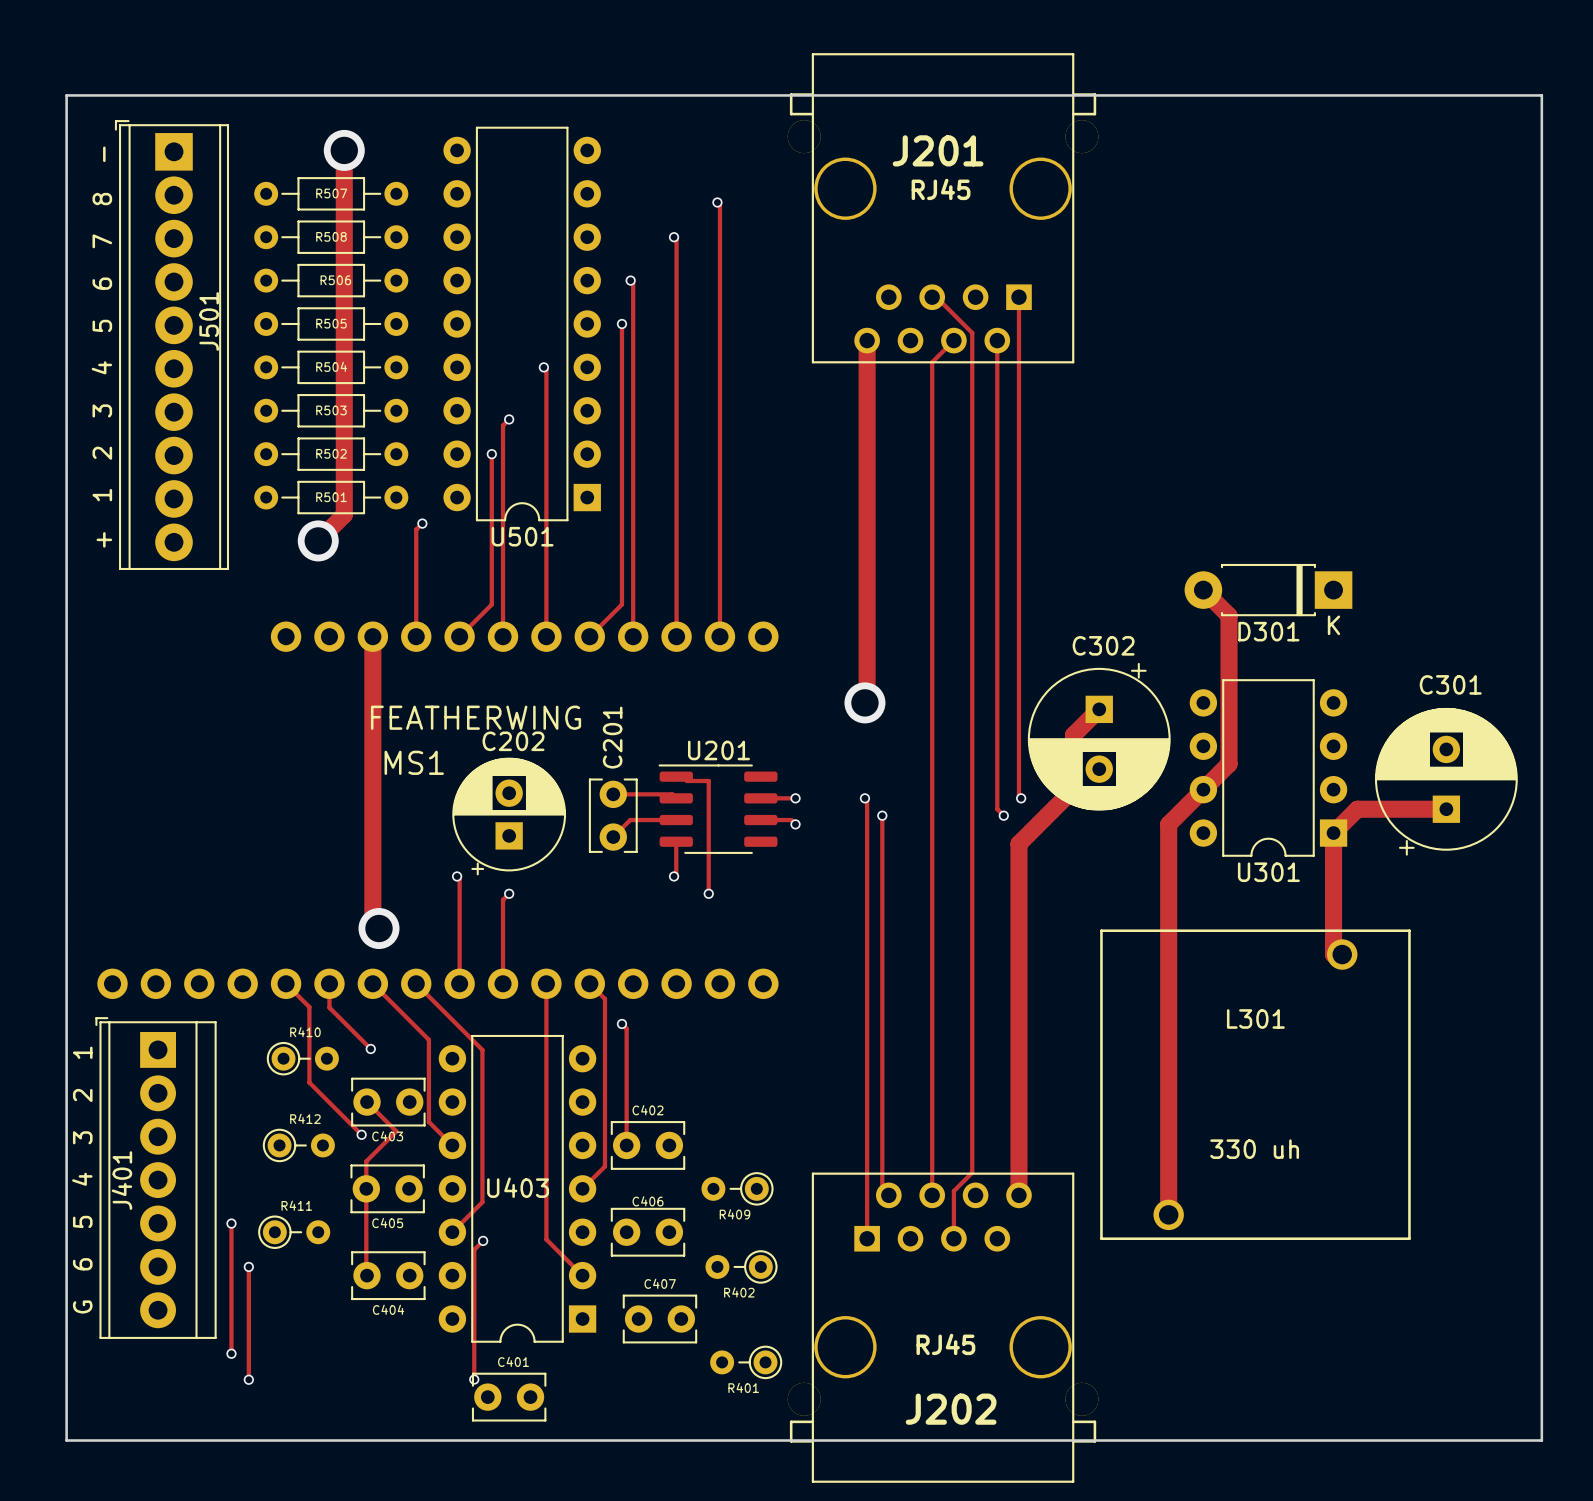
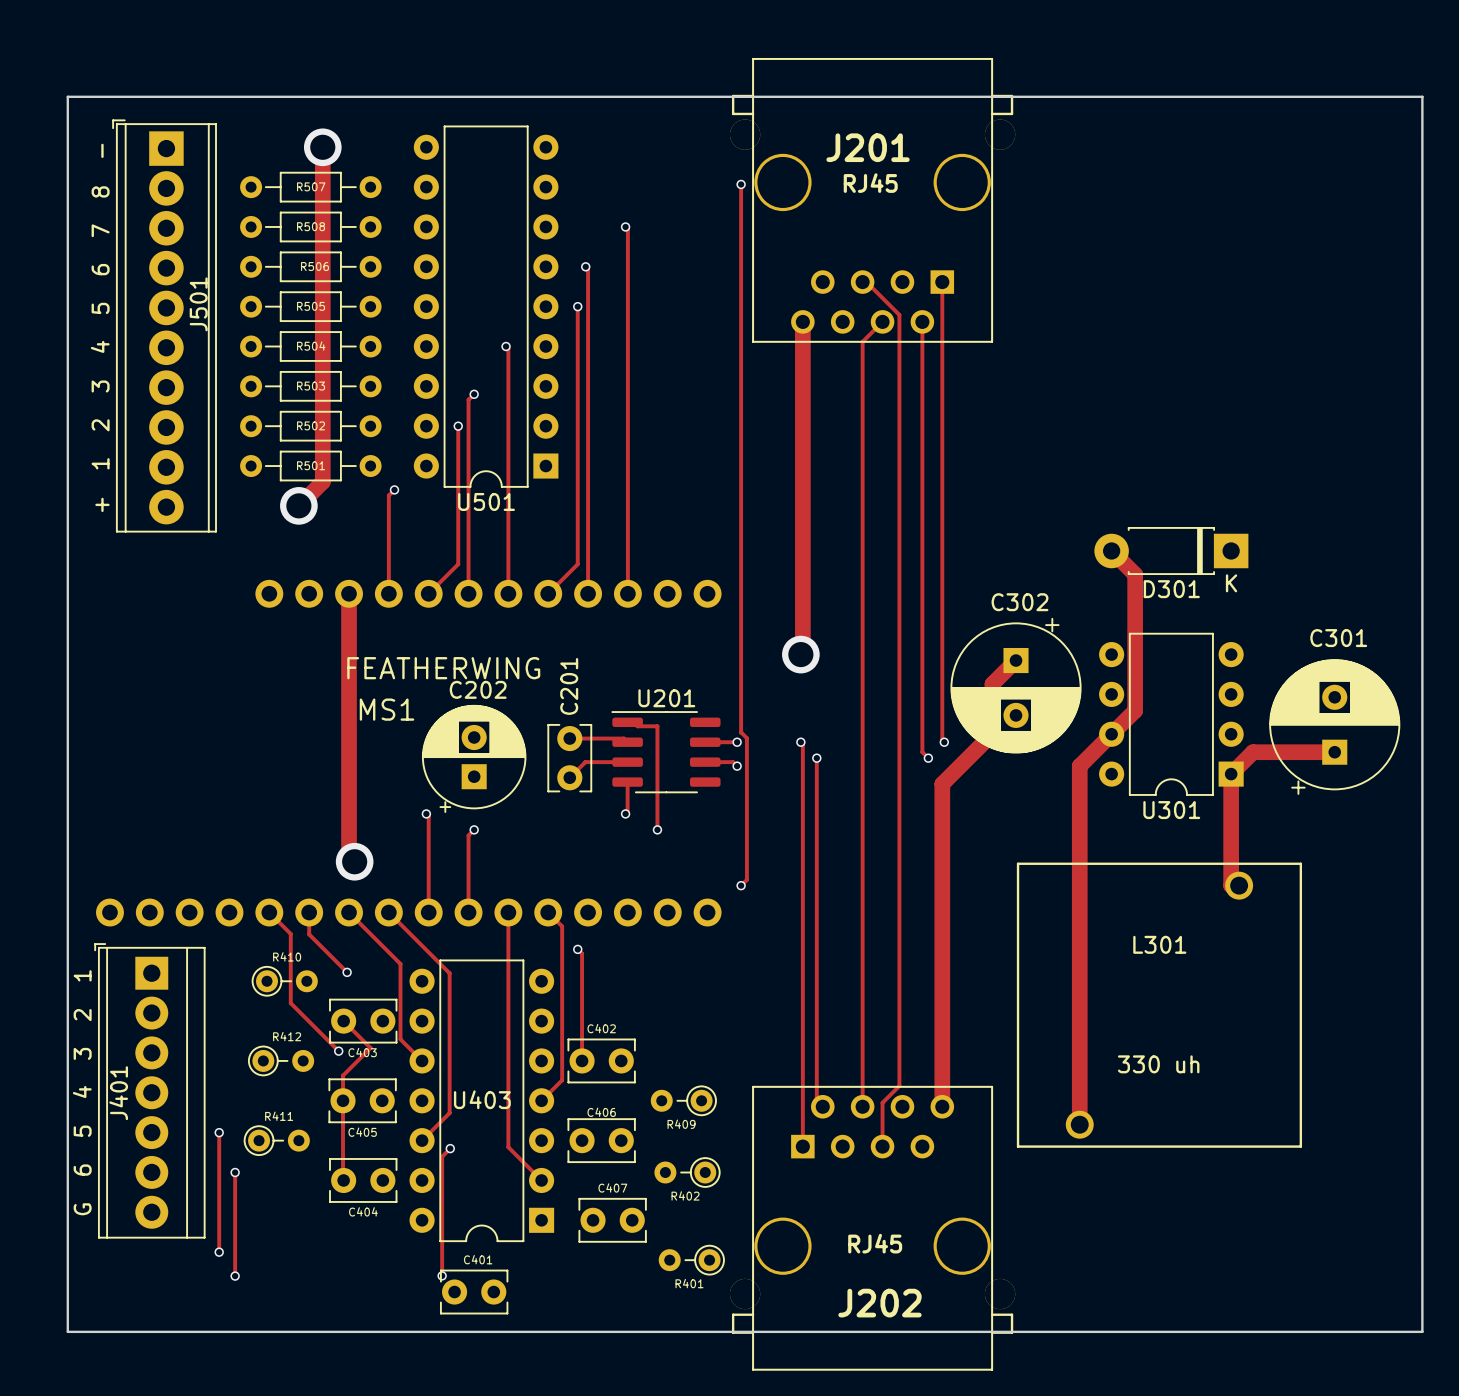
track: none -> (741, 184) (741, 732) (746, 738) (746, 879) (741, 885)
track: (717, 202) (719, 205) (719, 636) -> none
via position: (717, 202) -> (741, 184)
via: none -> (741, 885)

